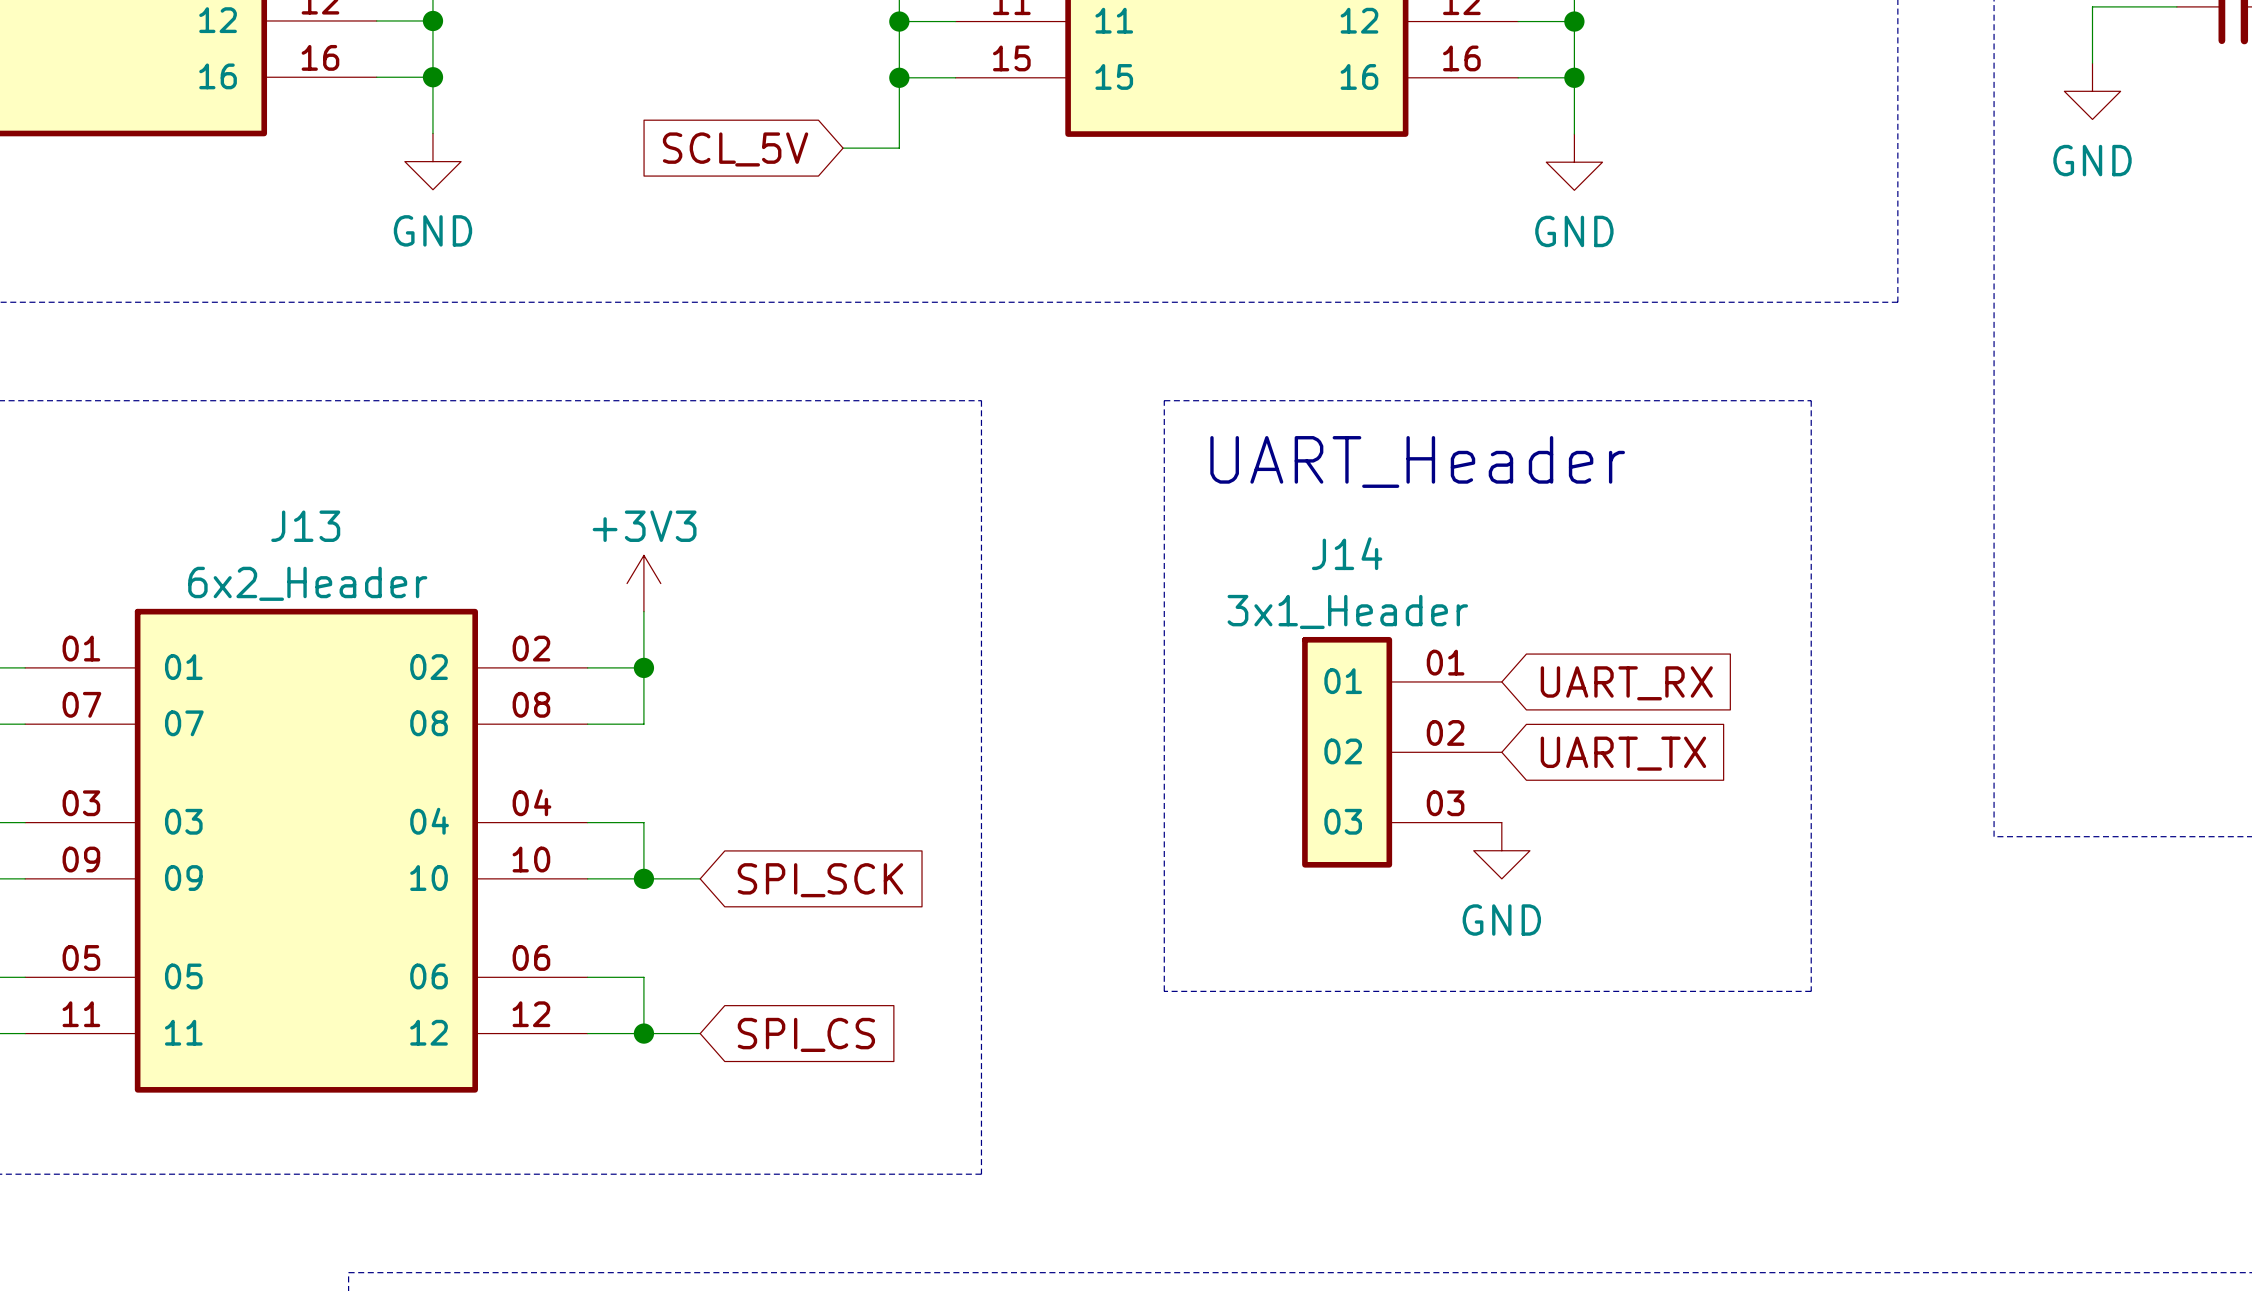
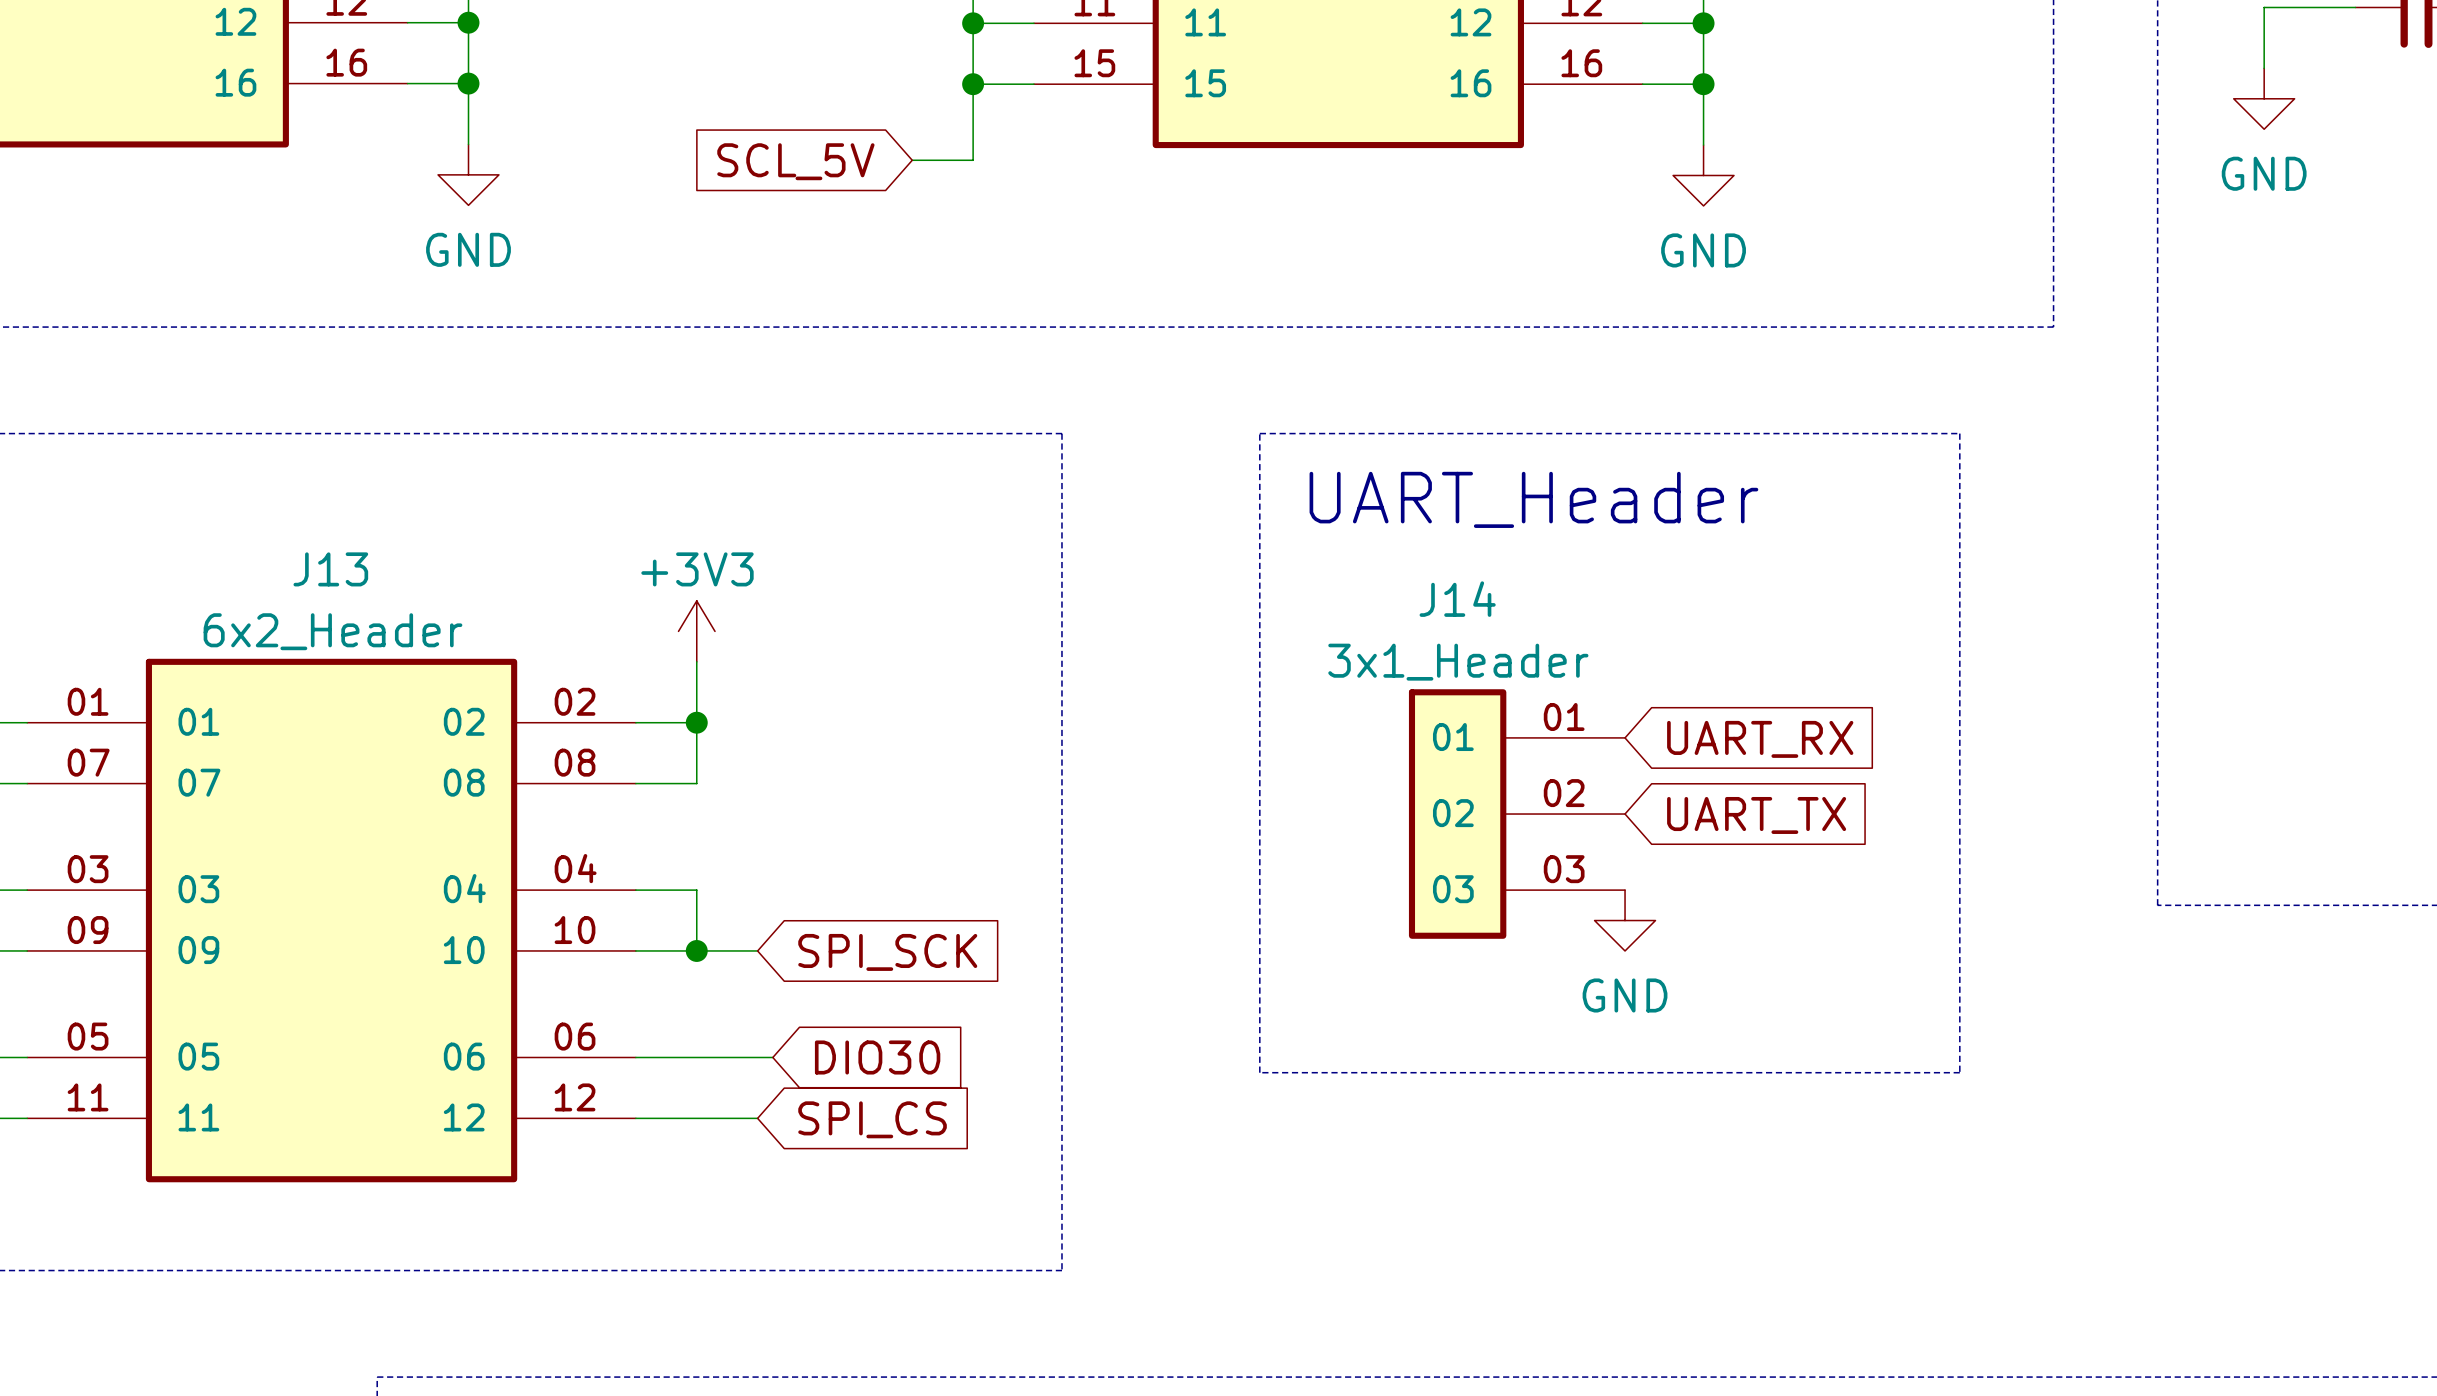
wire: (643, 977) (643, 1033) -> (696, 1057) (772, 1057)
global label: none -> DIO30 (877, 1057)
junction: (643, 1033) -> none

